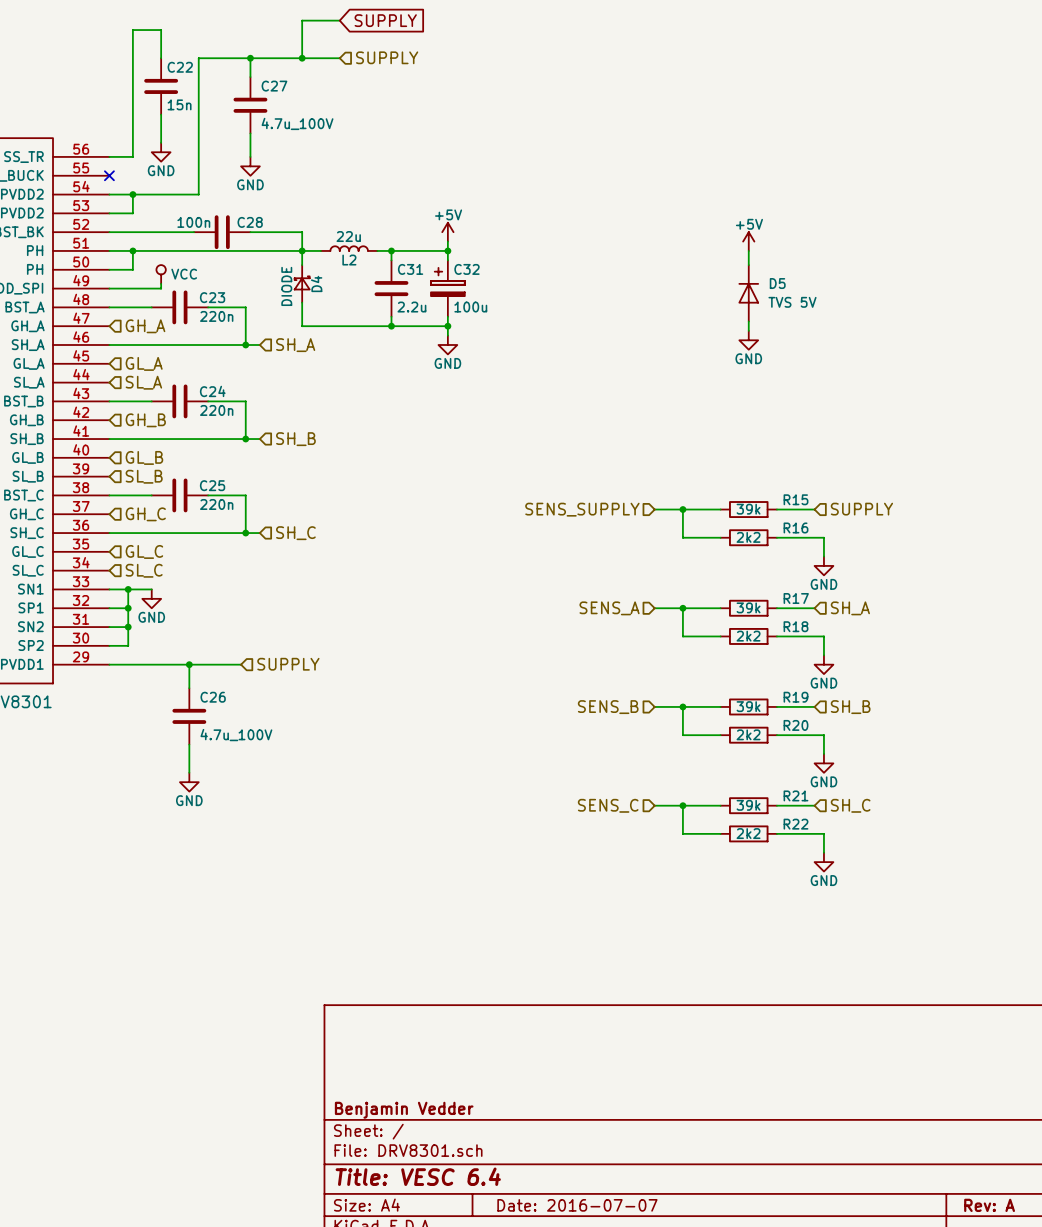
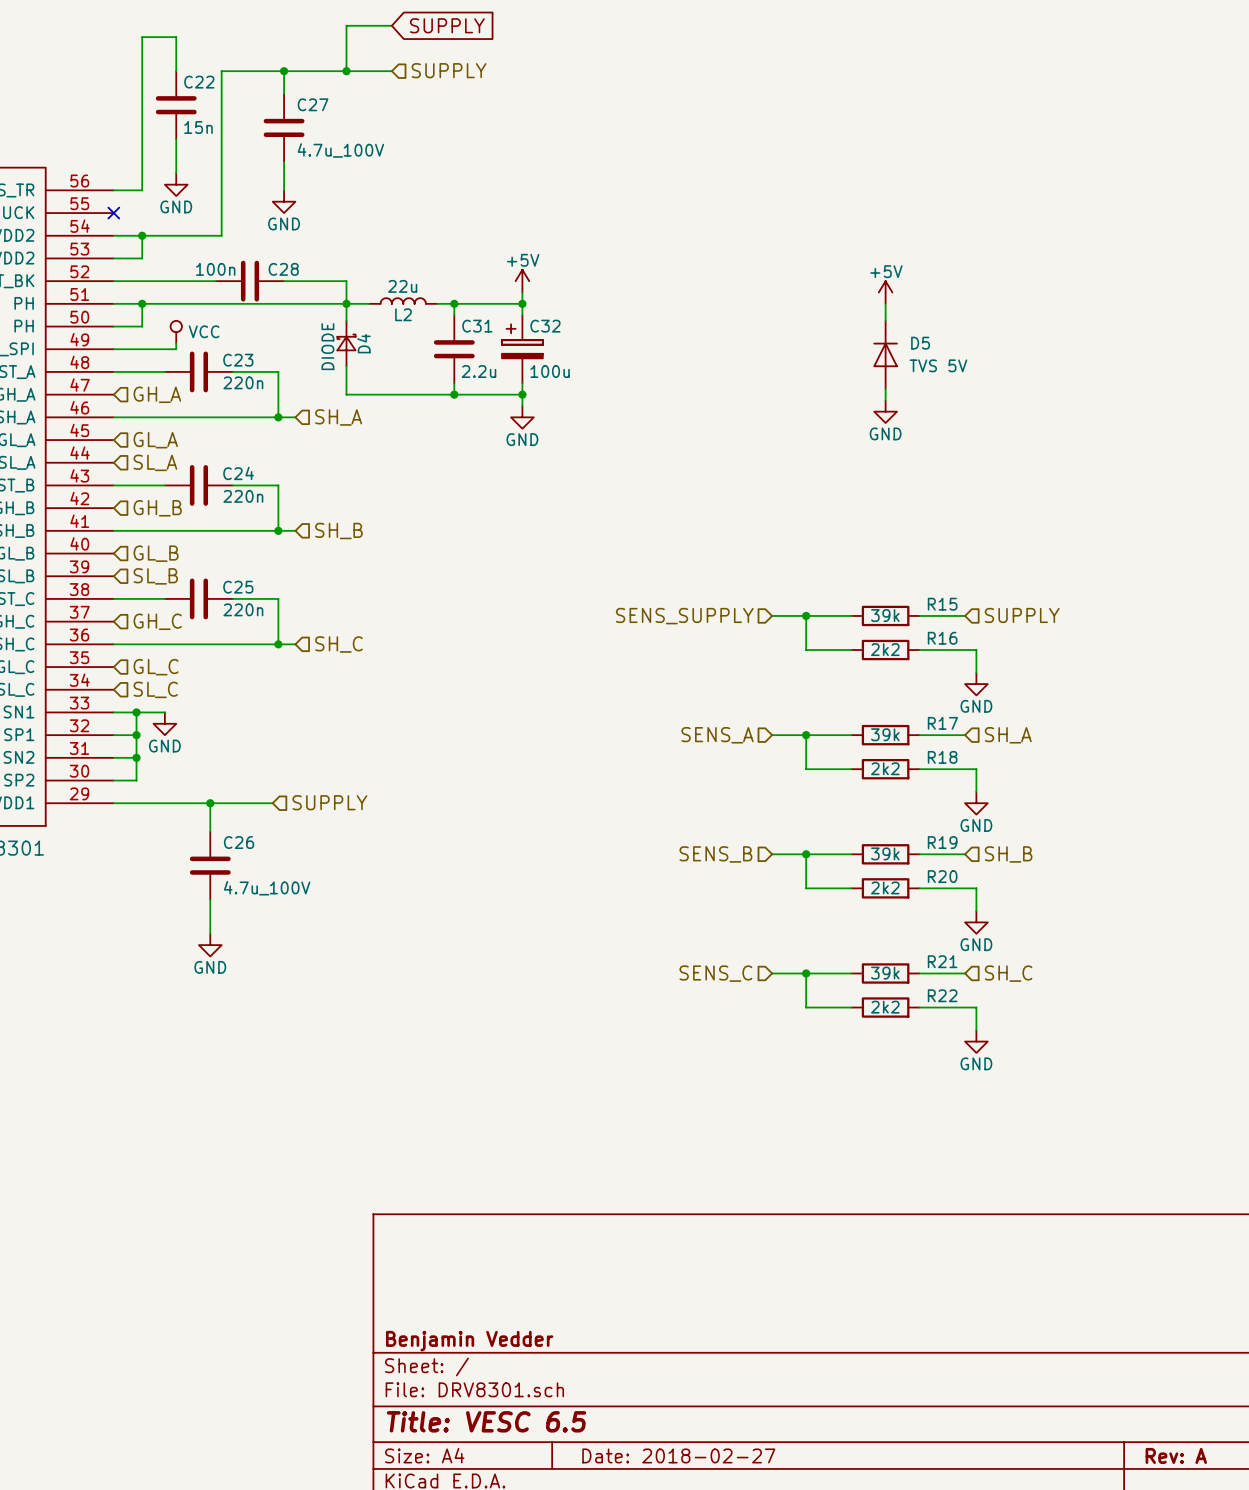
title block: Title: VESC 6.4 (418, 1176) -> Title: VESC 6.5 (486, 1421)
title block: Date: 2016-07-07 (577, 1205) -> Date: 2018-02-27 (678, 1455)

